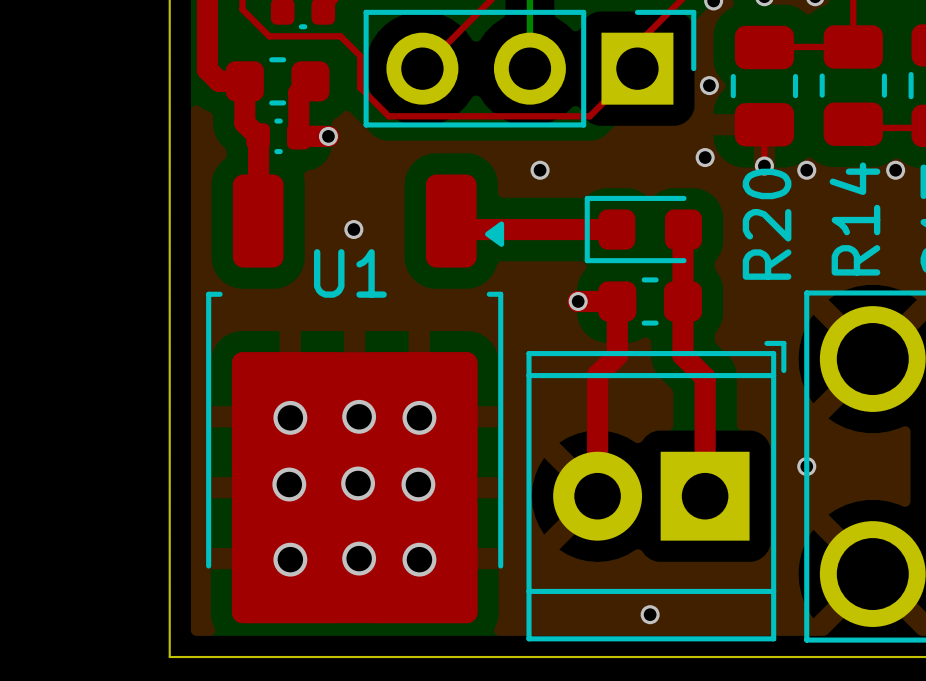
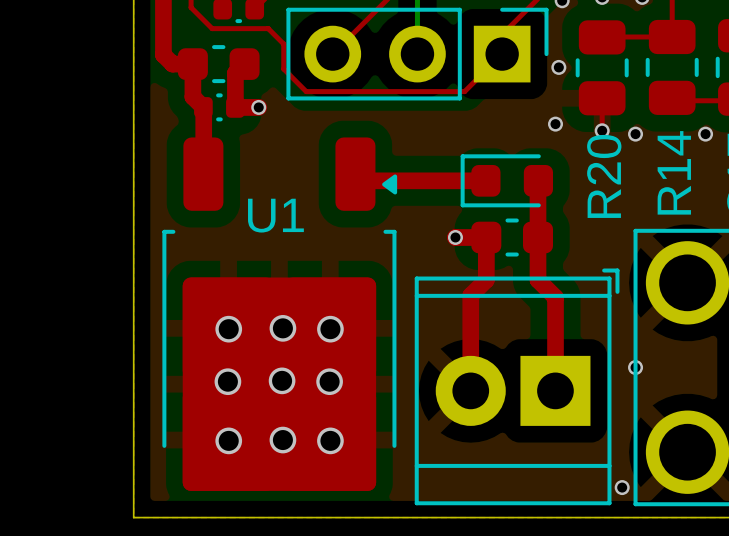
via: (540, 170) -> none
via: (353, 229) -> none
via position: (650, 614) -> (622, 487)

